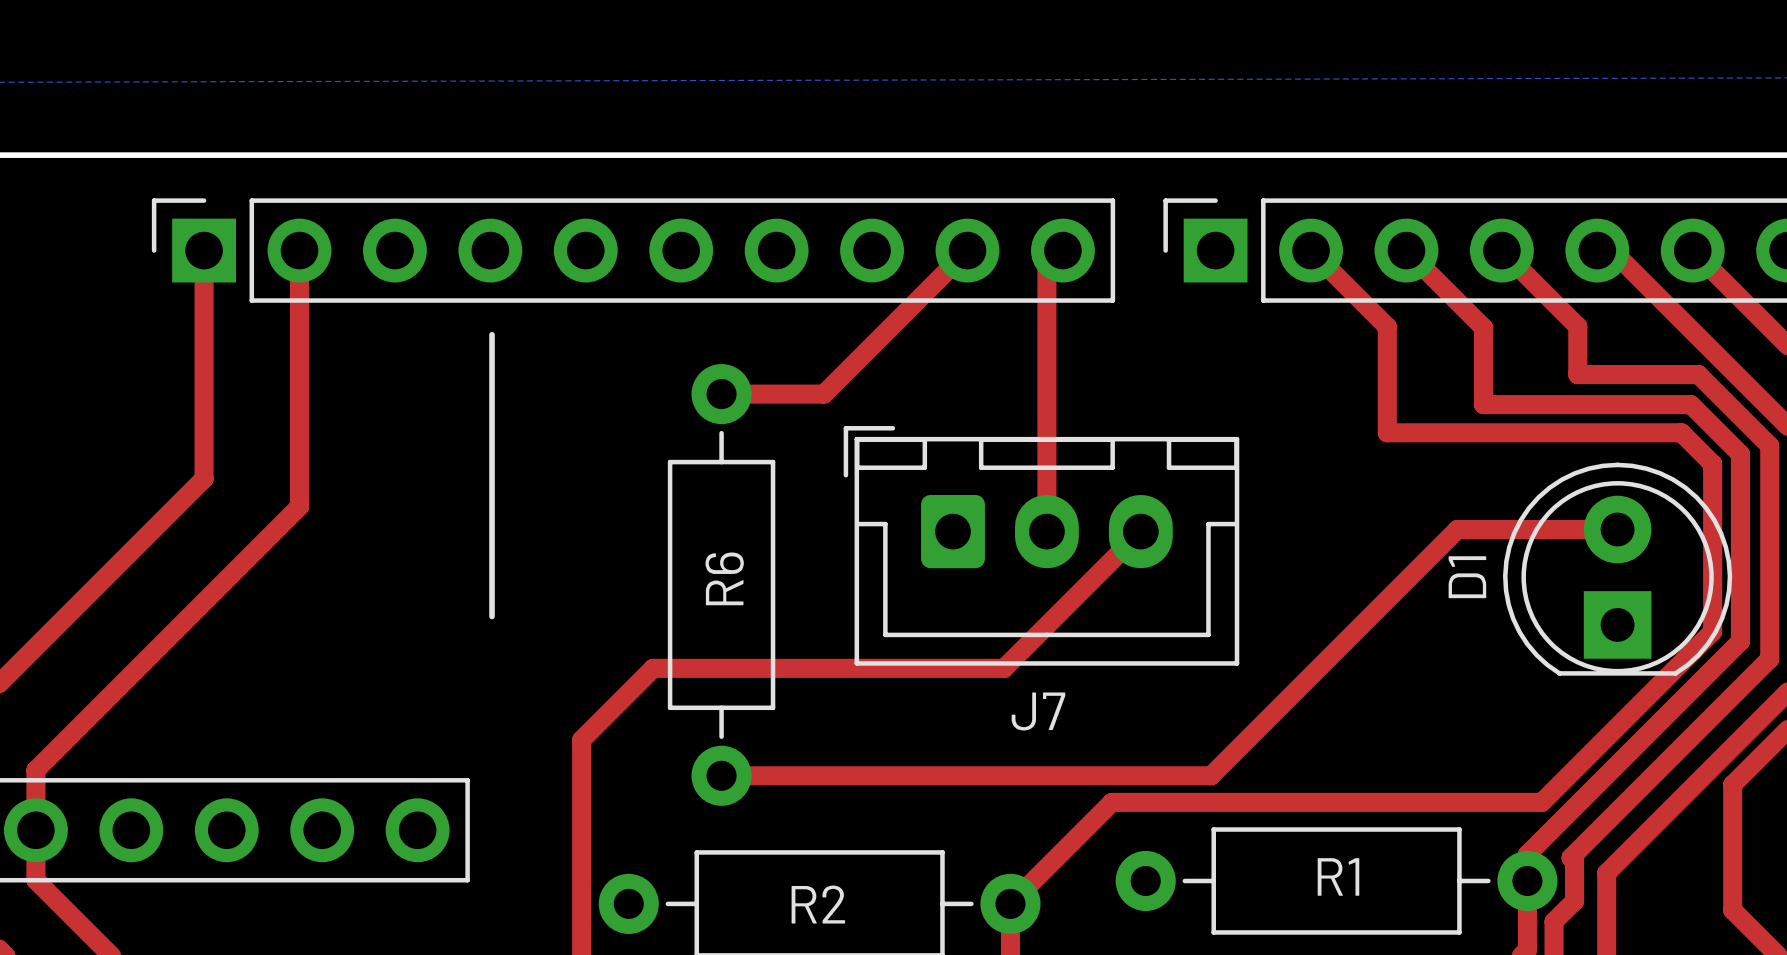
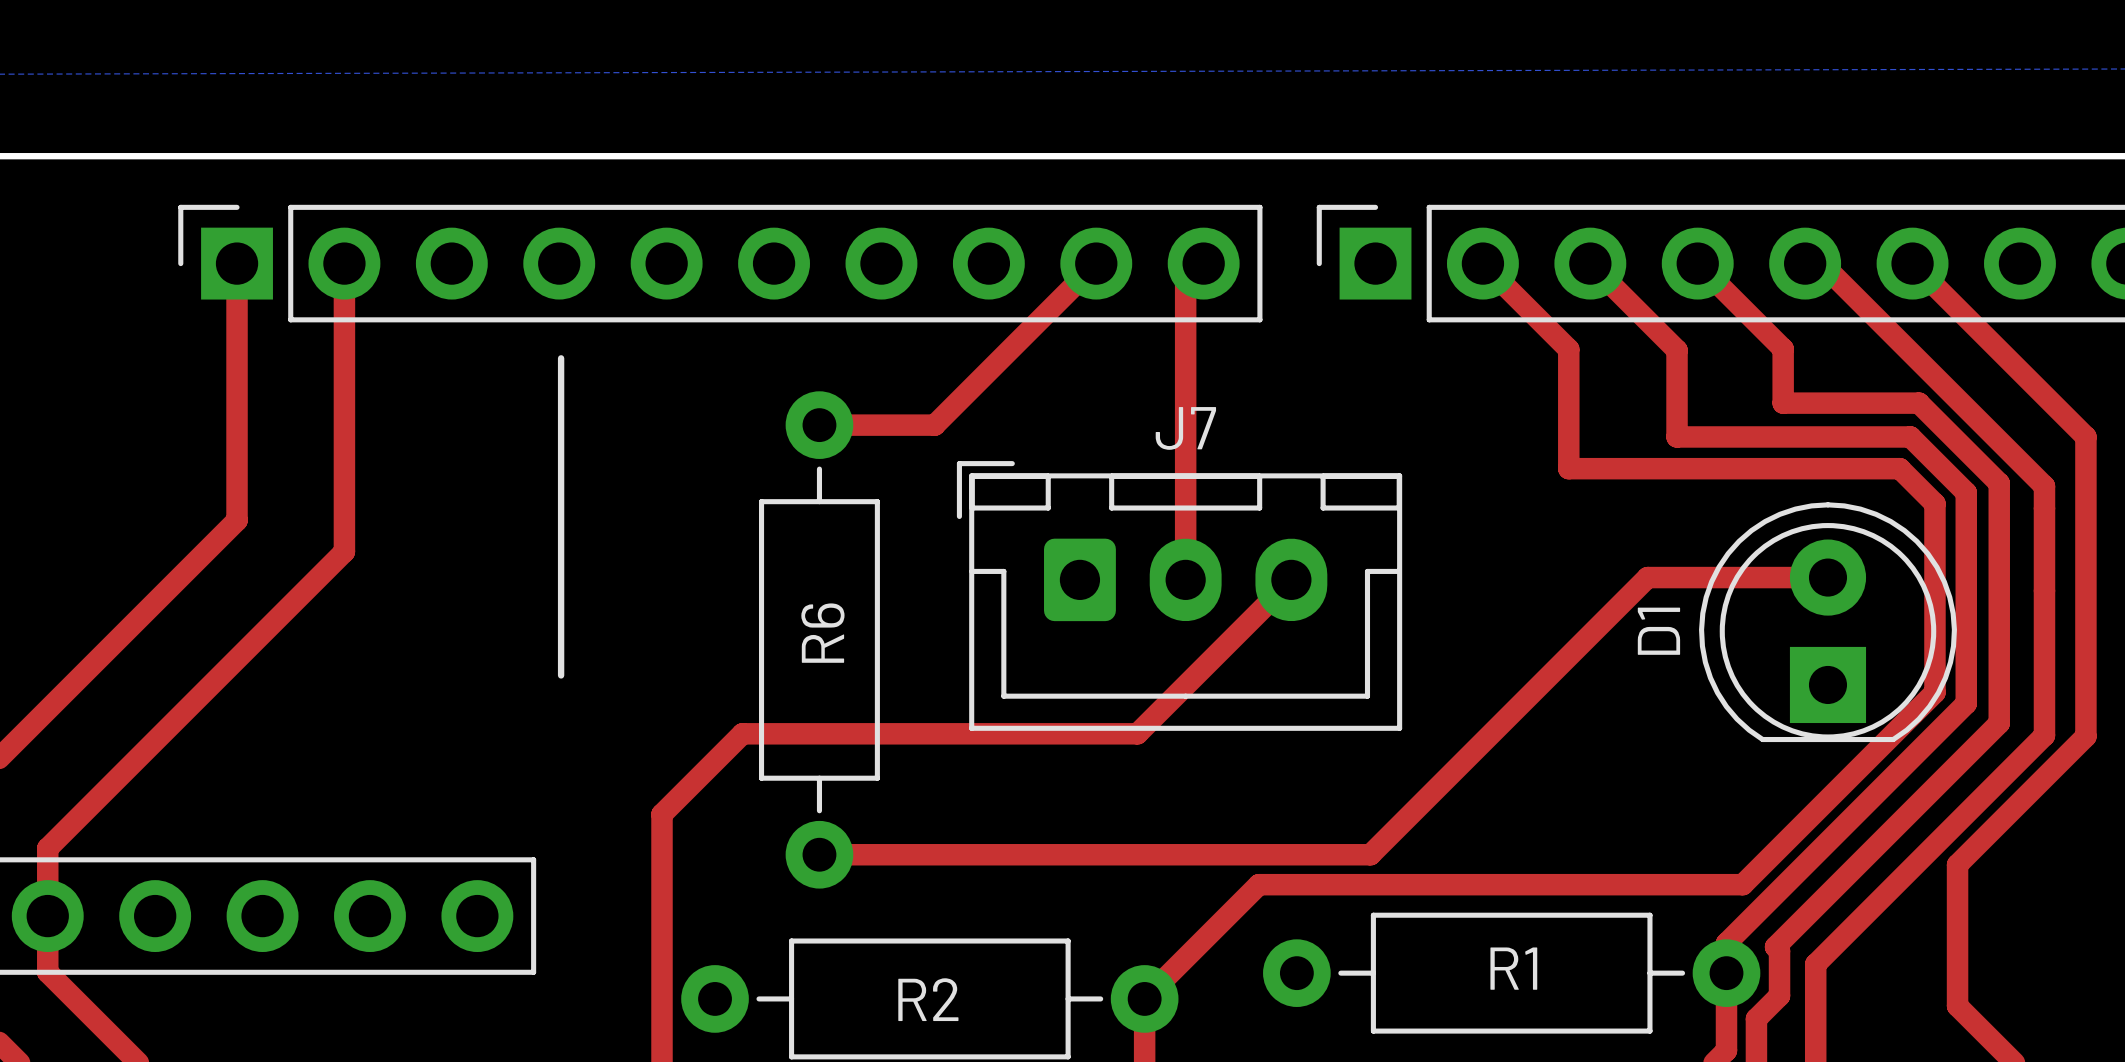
J7 name position: J7 (1038, 711) -> J7 (1185, 428)

